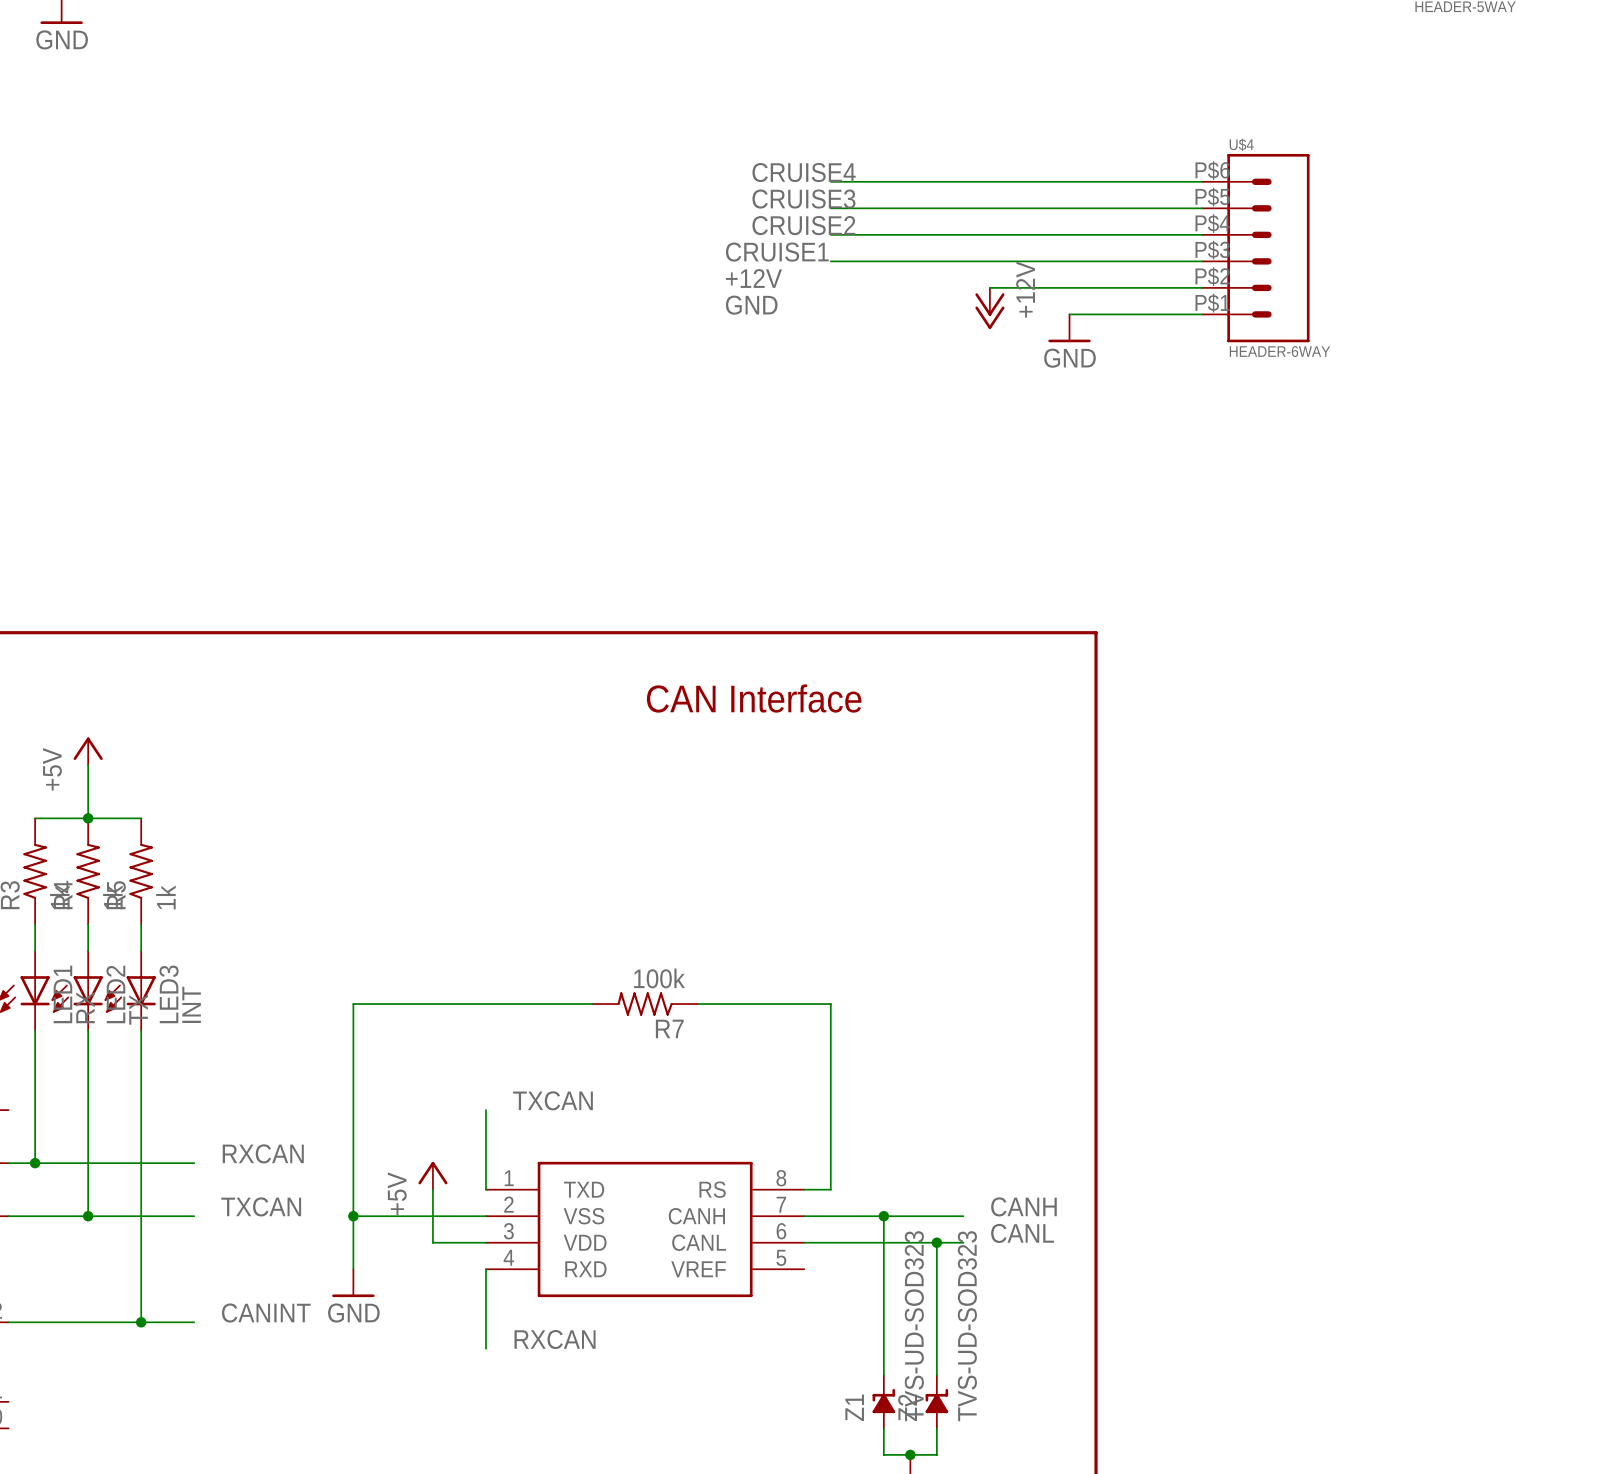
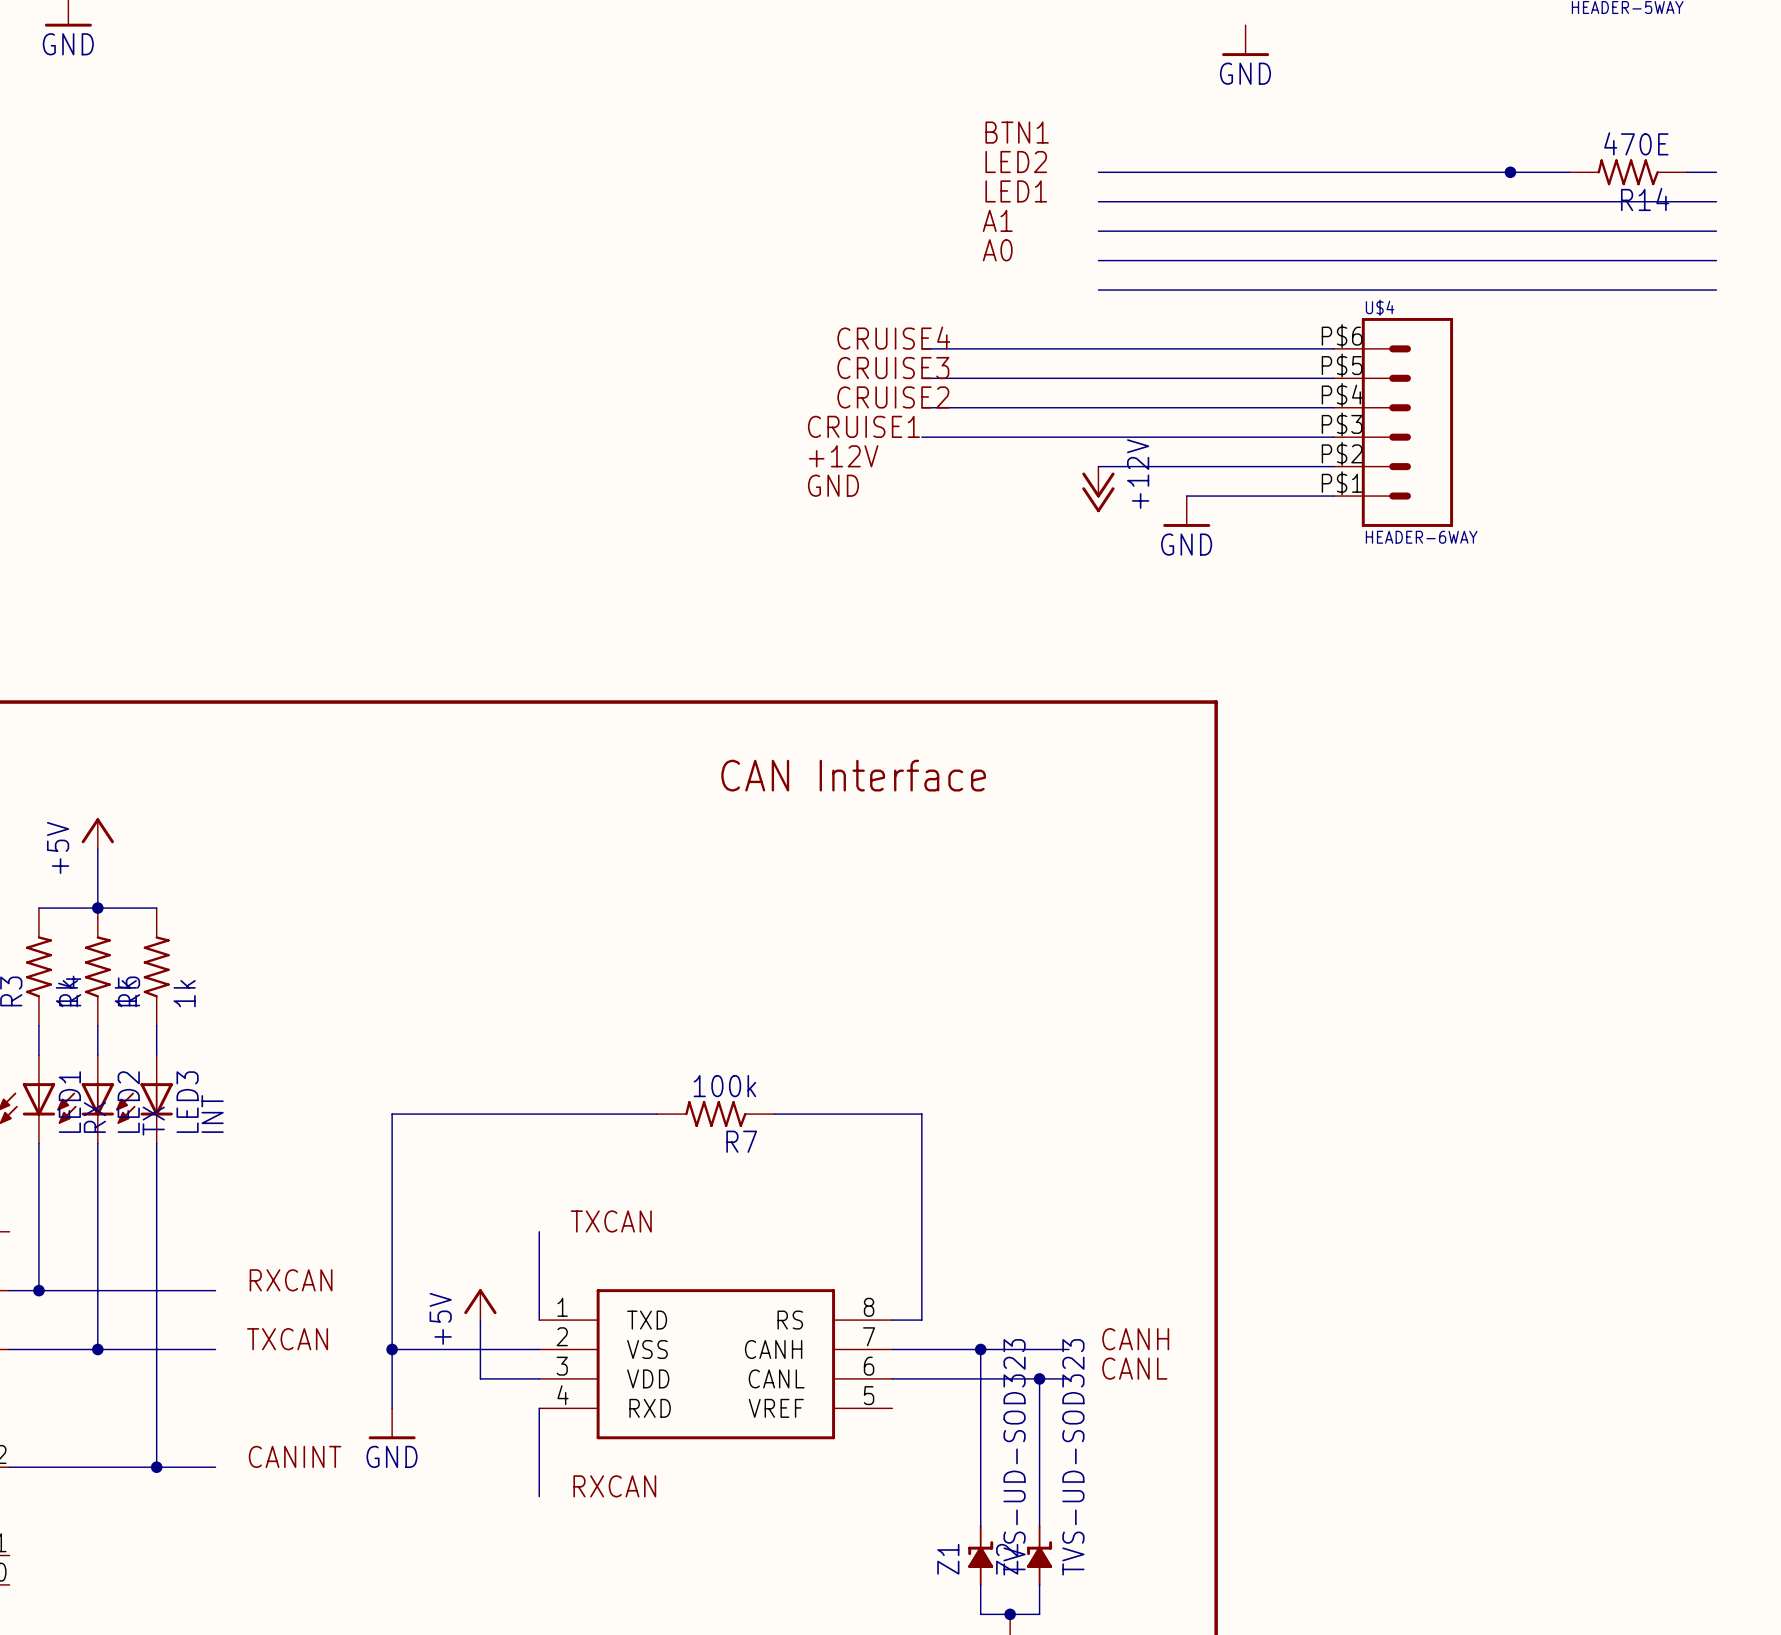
power symbol: none -> GND (1245, 40)
label: none -> BTN1 (1017, 132)
label: none -> LED2 (1016, 162)
wire: none -> (1098, 172) (1569, 172)
junction: none -> (1510, 172)
R14: none -> 470E (1628, 172)
wire: none -> (1687, 172) (1716, 172)
label position: CRUISE4 (804, 172) -> CRUISE4 (893, 338)
label: none -> LED1 (1016, 191)
wire: (830, 181) (989, 181) -> none
wire: none -> (1333, 201) (1716, 201)
label position: CRUISE3 (803, 199) -> CRUISE3 (893, 368)
label: none -> A1 (997, 220)
wire: (830, 208) (989, 208) -> none
wire: none -> (1333, 231) (1716, 231)
label position: CRUISE2 (803, 225) -> CRUISE2 (893, 397)
label: none -> A0 (997, 250)
wire: (830, 234) (989, 234) -> none
wire: none -> (1333, 260) (1716, 260)
U$4 position: (1255, 248) -> (1393, 422)
label position: CRUISE1 (777, 252) -> CRUISE1 (863, 426)
wire: (830, 261) (989, 261) -> none
wire: none -> (1333, 290) (1716, 290)
label position: +12V (753, 278) -> +12V (843, 456)
wire: (989, 287) (1202, 287) -> (1098, 466) (1333, 466)
label position: GND (751, 305) -> GND (833, 485)
power symbol position: +12V (989, 308) -> +12V (1098, 489)
wire: none -> (921, 348) (1186, 348)
power symbol position: GND (1069, 328) -> GND (1186, 511)
wire: none -> (921, 378) (1333, 378)
wire: none -> (921, 407) (1333, 407)
wire: none -> (921, 437) (1333, 437)
wire: none -> (1186, 496) (1333, 496)

